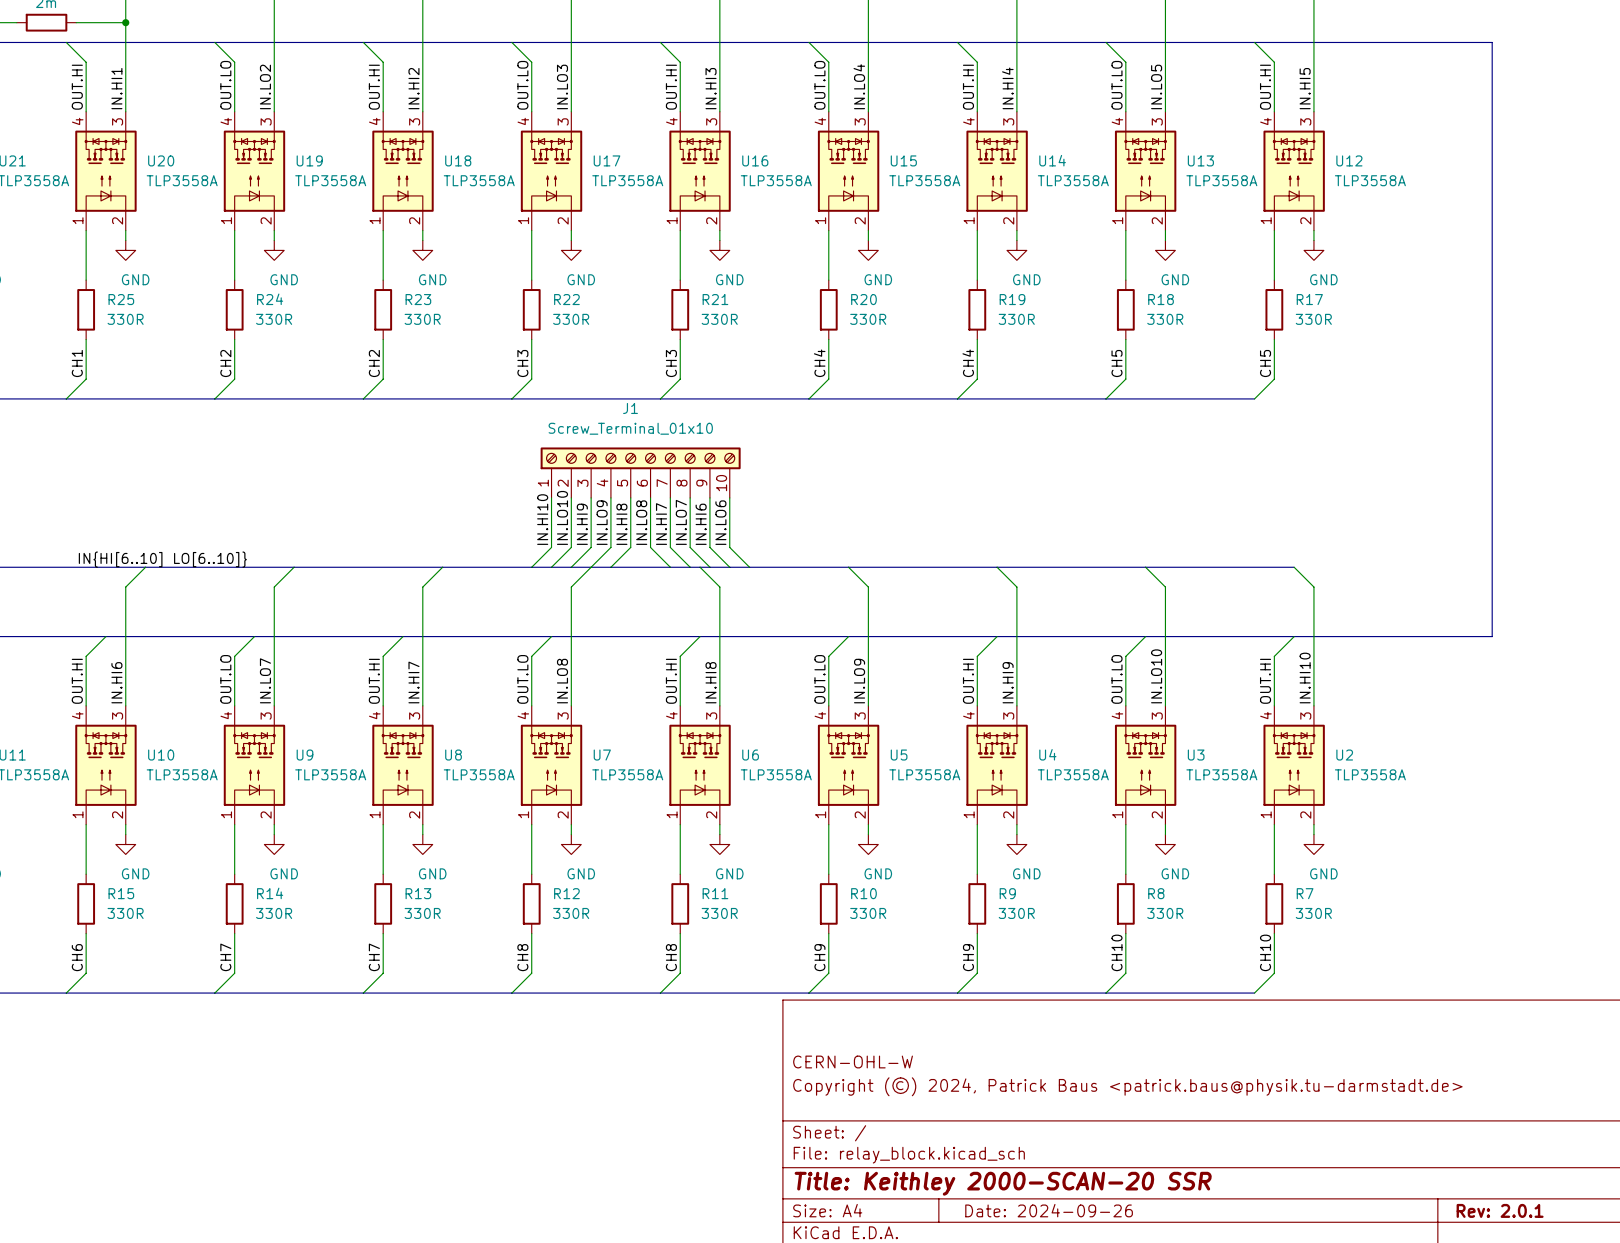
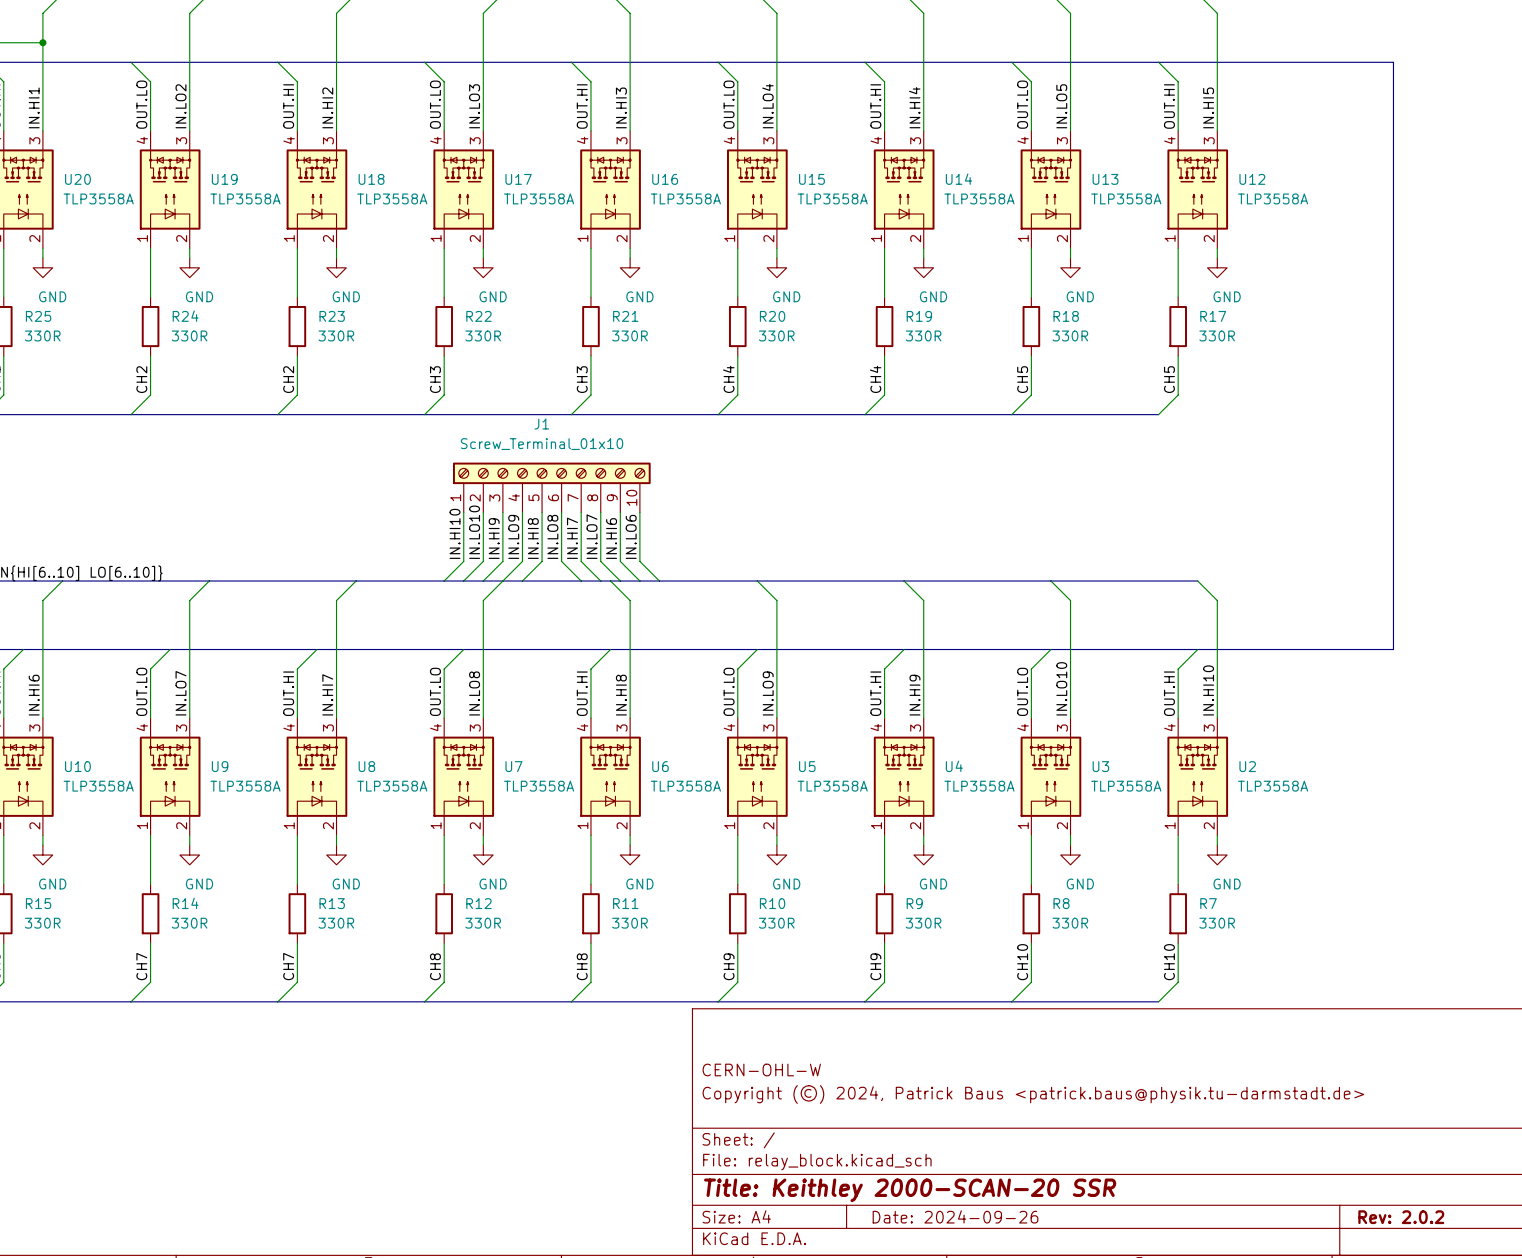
title block: Rev: 2.0.1 (1500, 1210) -> Rev: 2.0.2 (1401, 1217)

